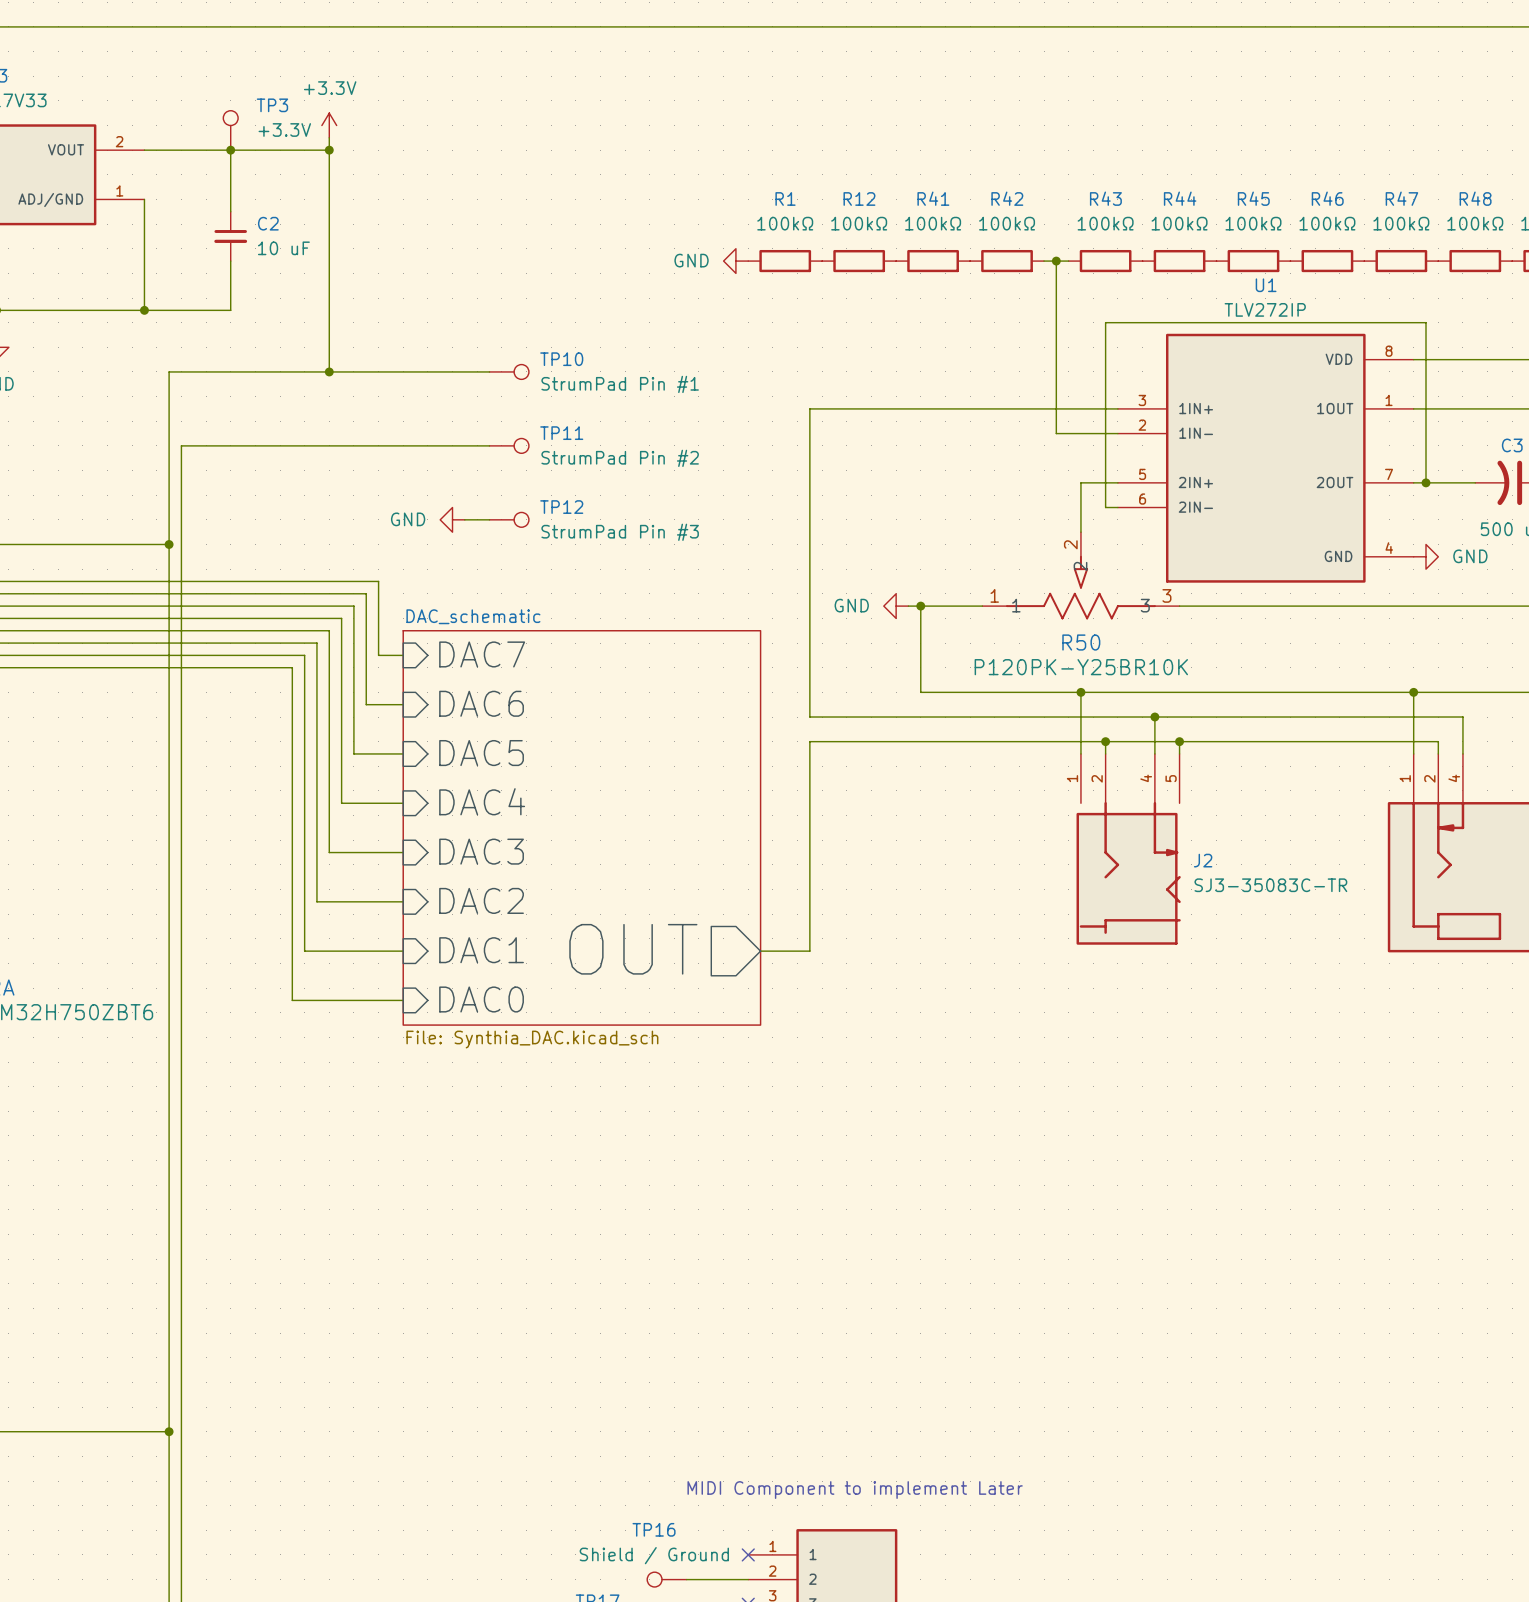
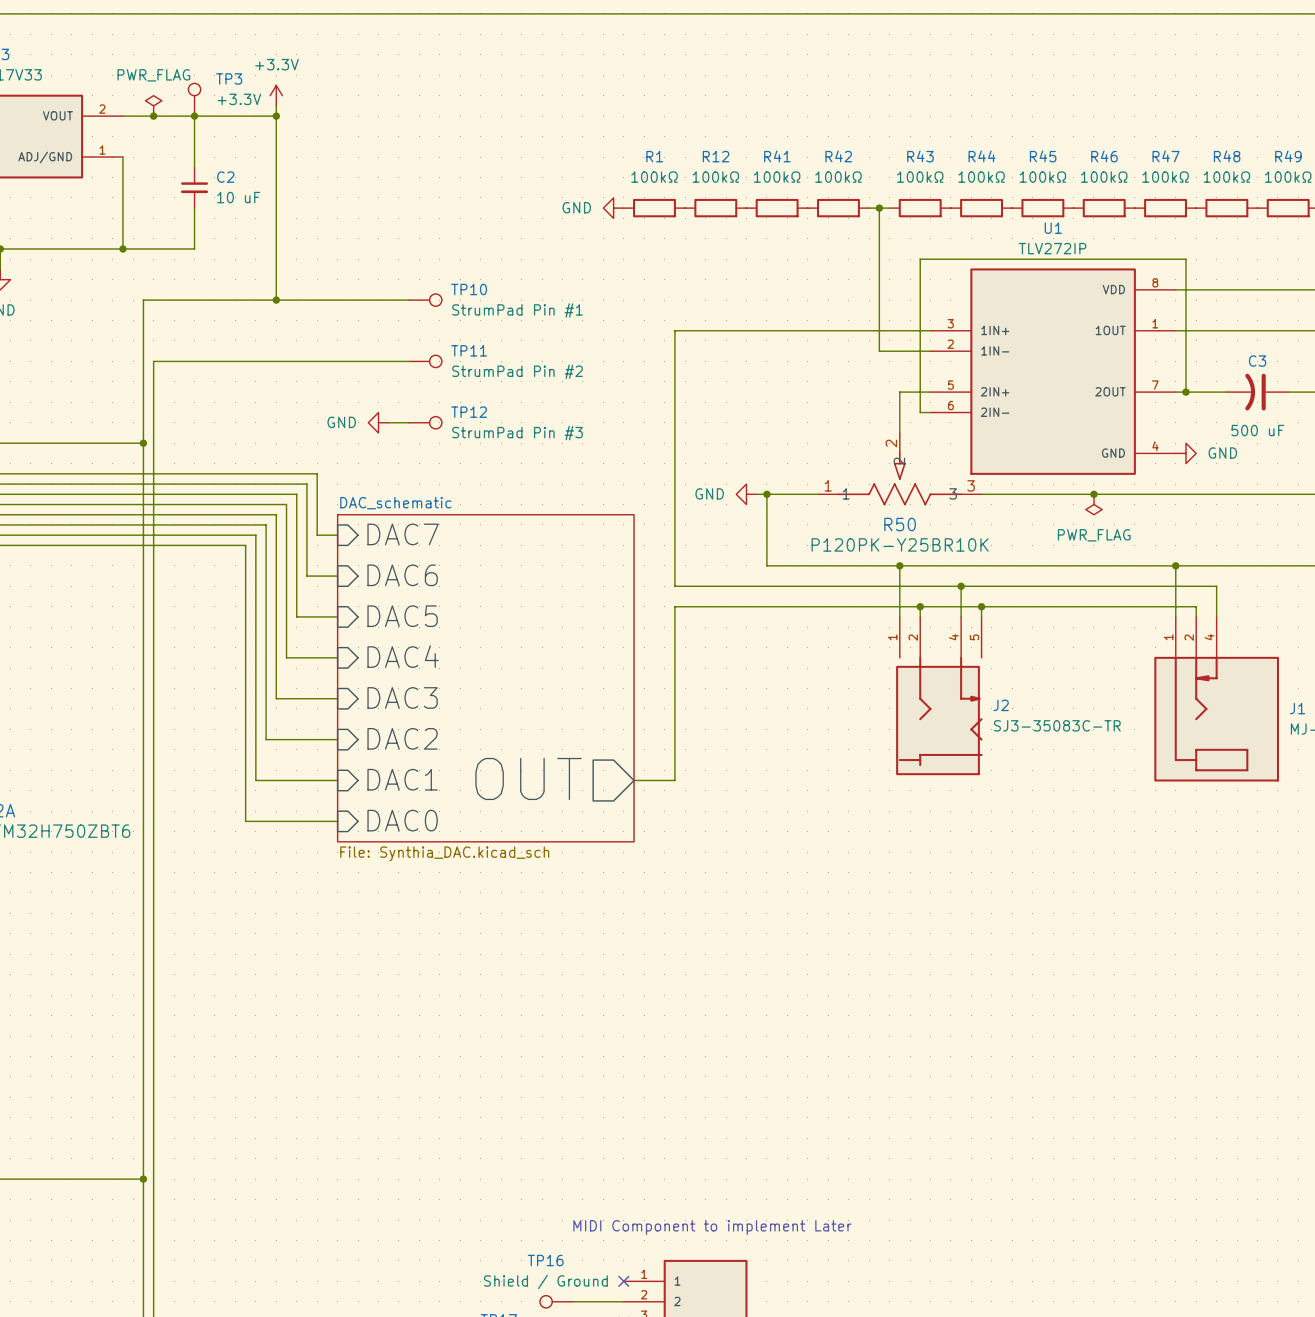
power symbol: none -> PWR_FLAG (153, 105)
junction: none -> (153, 116)
junction: none -> (1093, 494)
power symbol: none -> PWR_FLAG (1093, 504)

